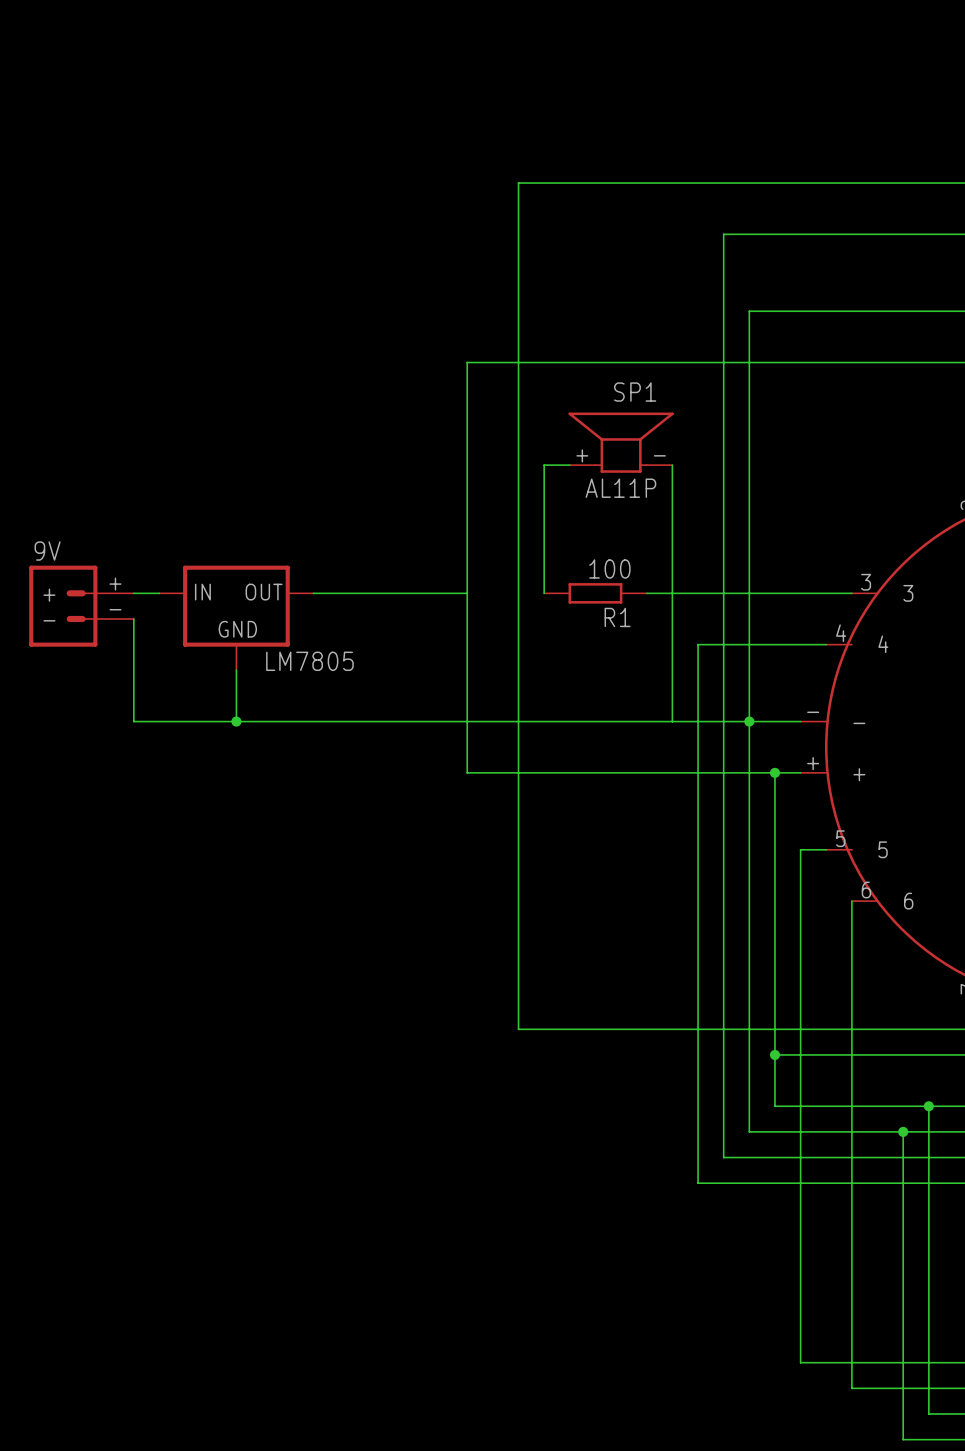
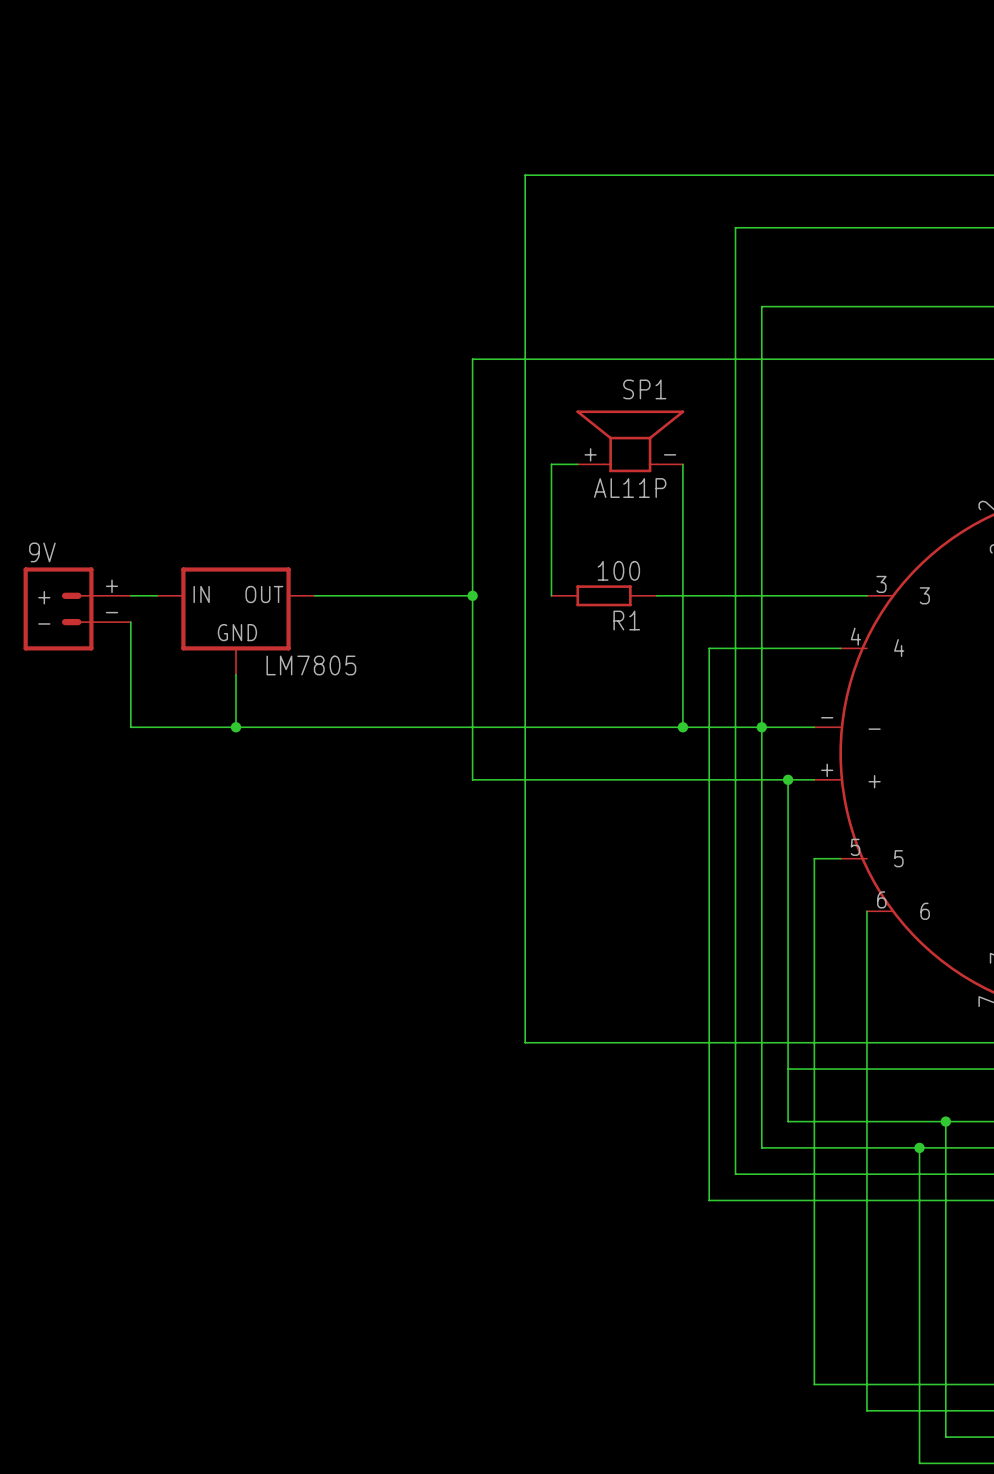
junction: none -> (472, 595)
junction: none -> (682, 727)
junction: (774, 1054) -> none

